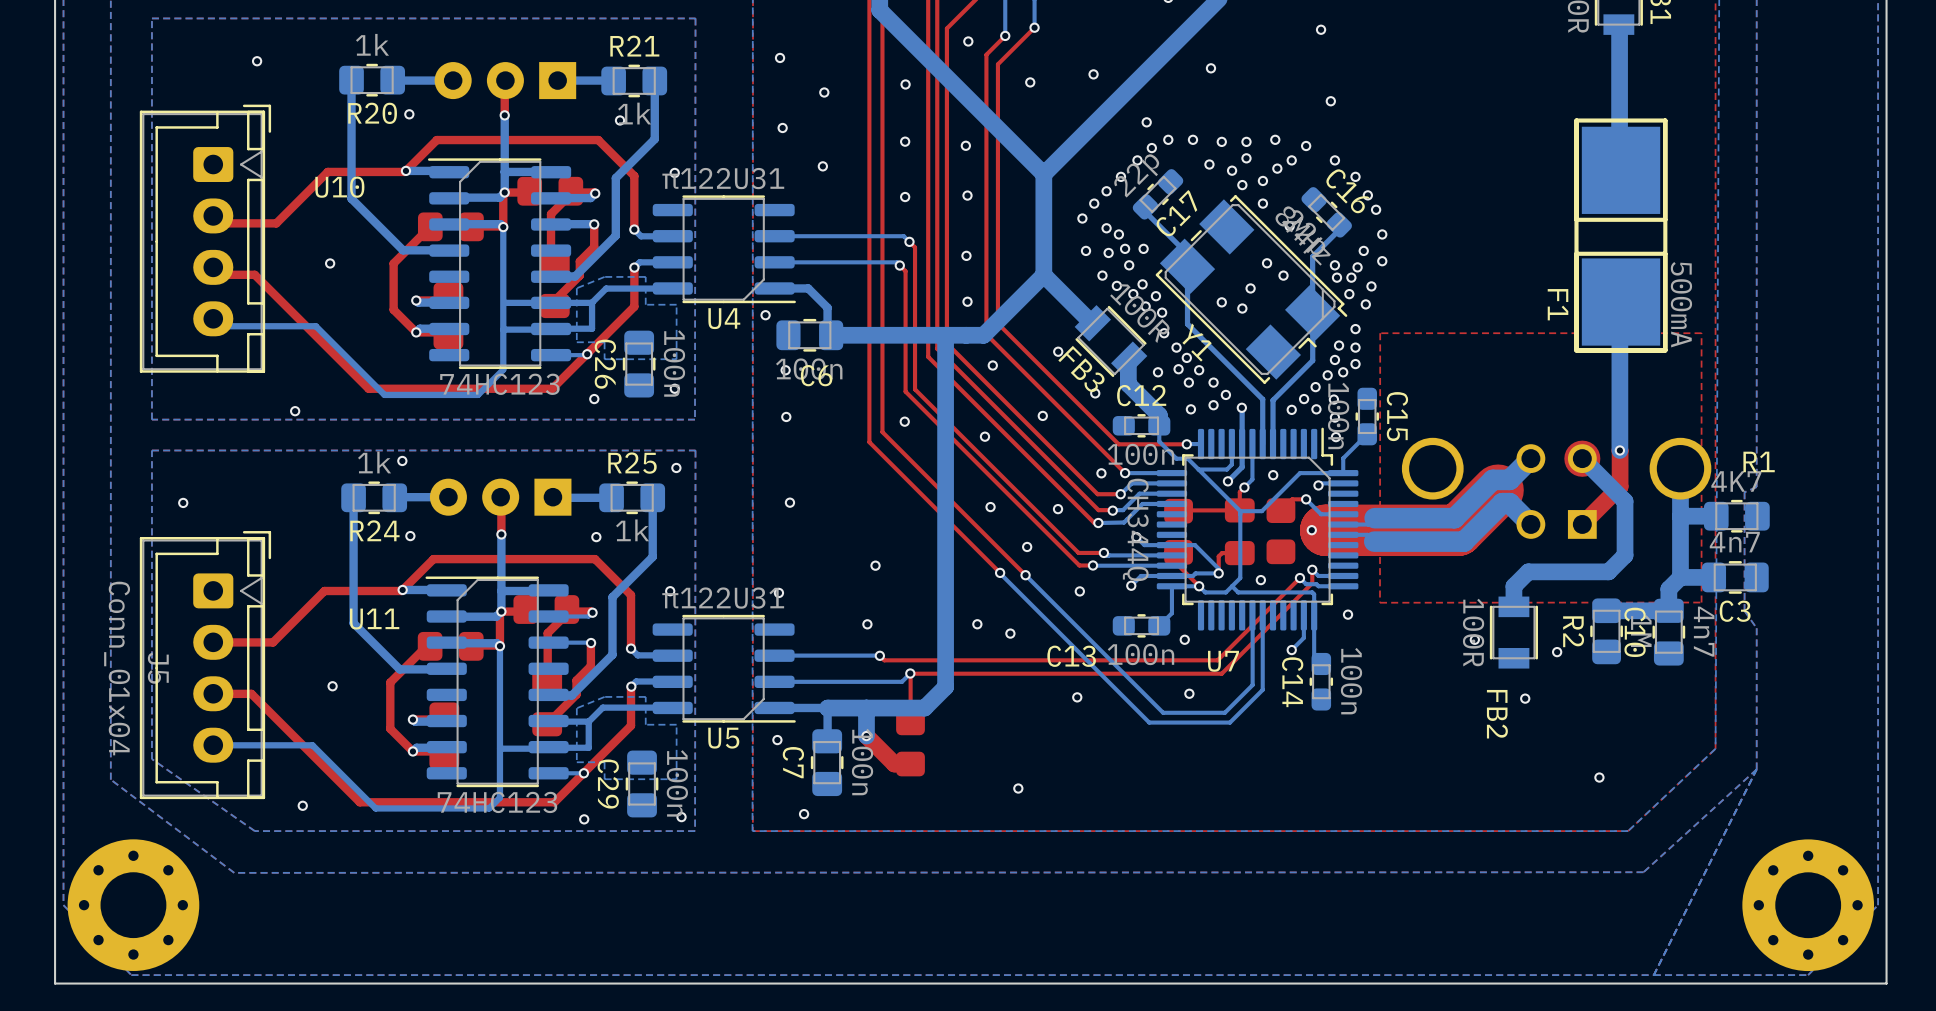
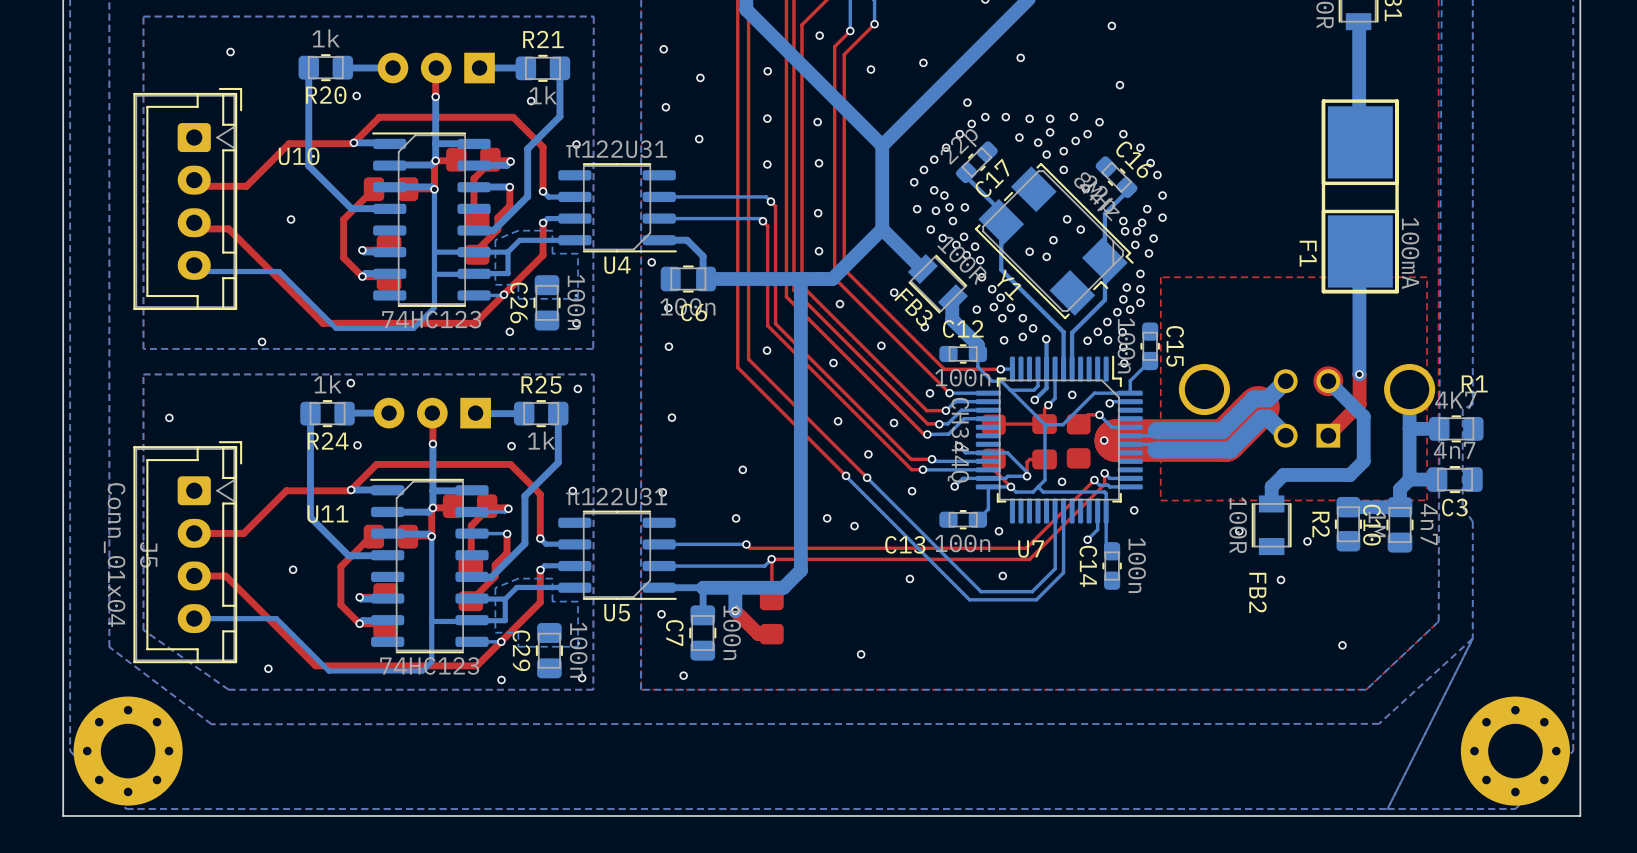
F1 value: 500mA (1681, 304) -> 100mA (1410, 253)

